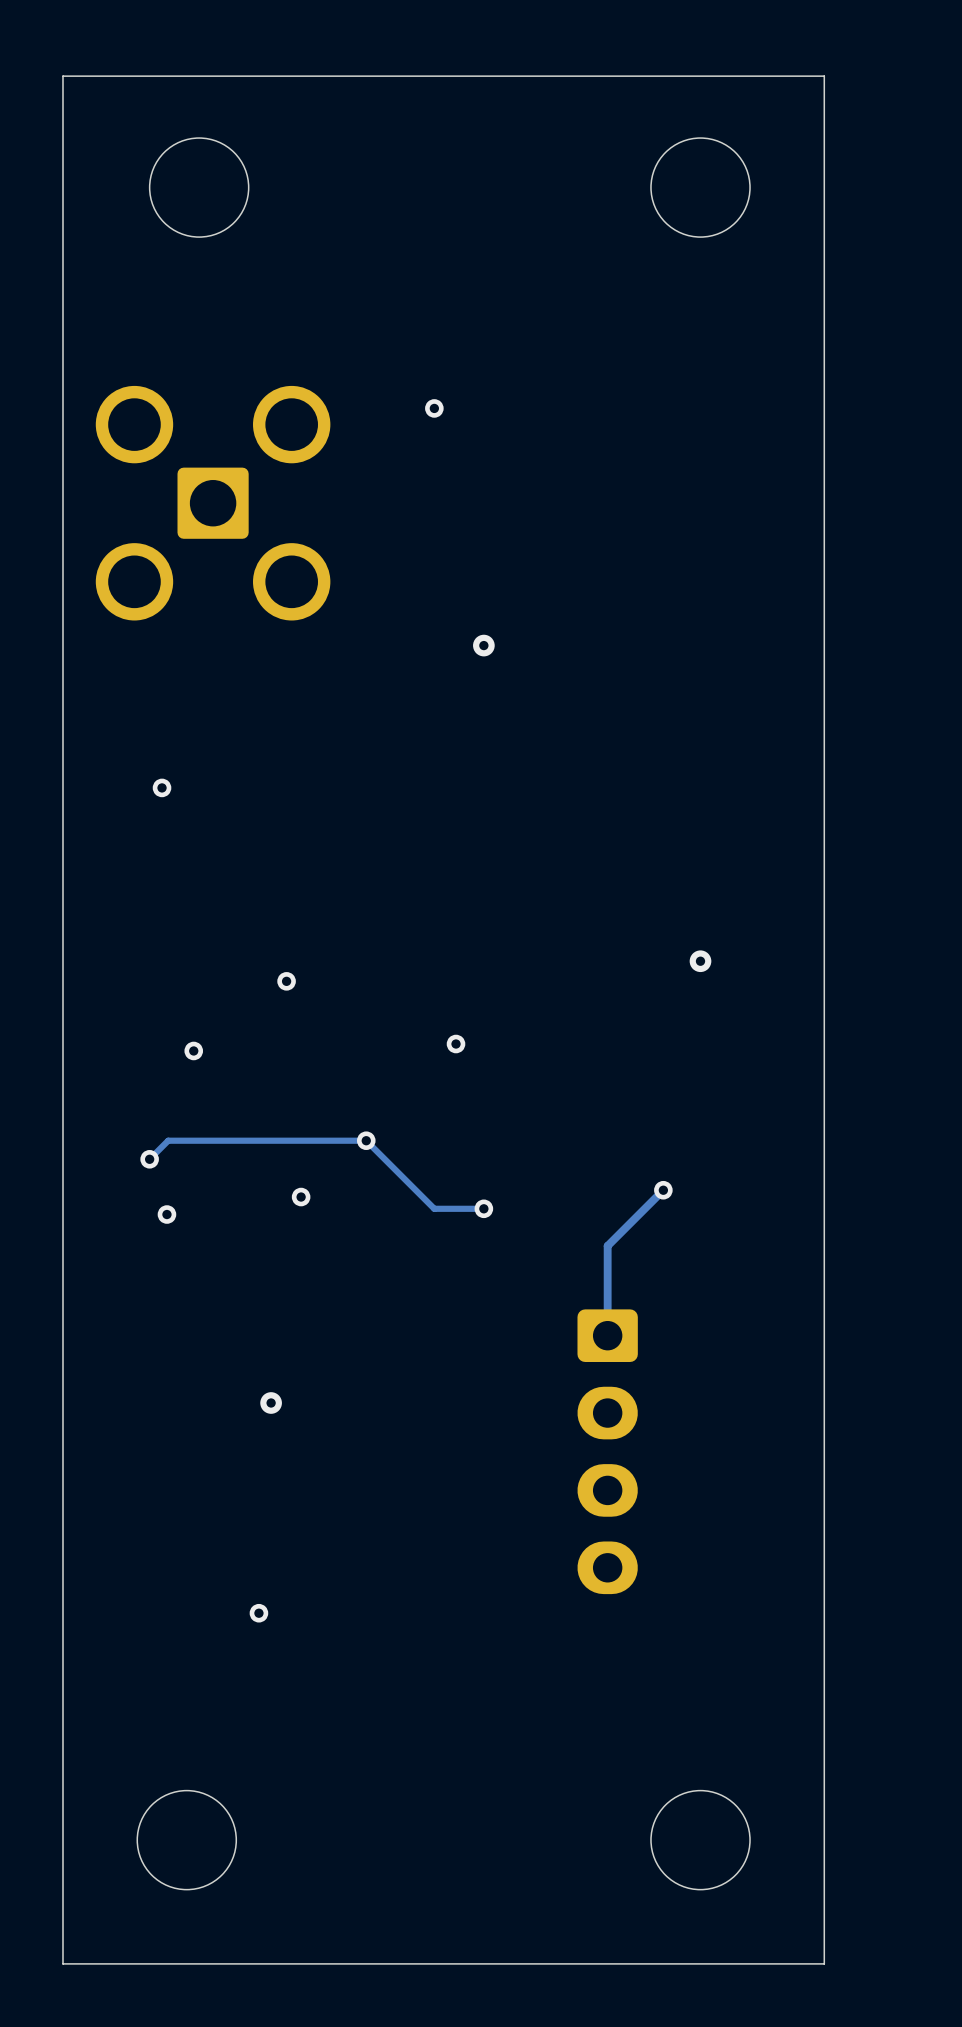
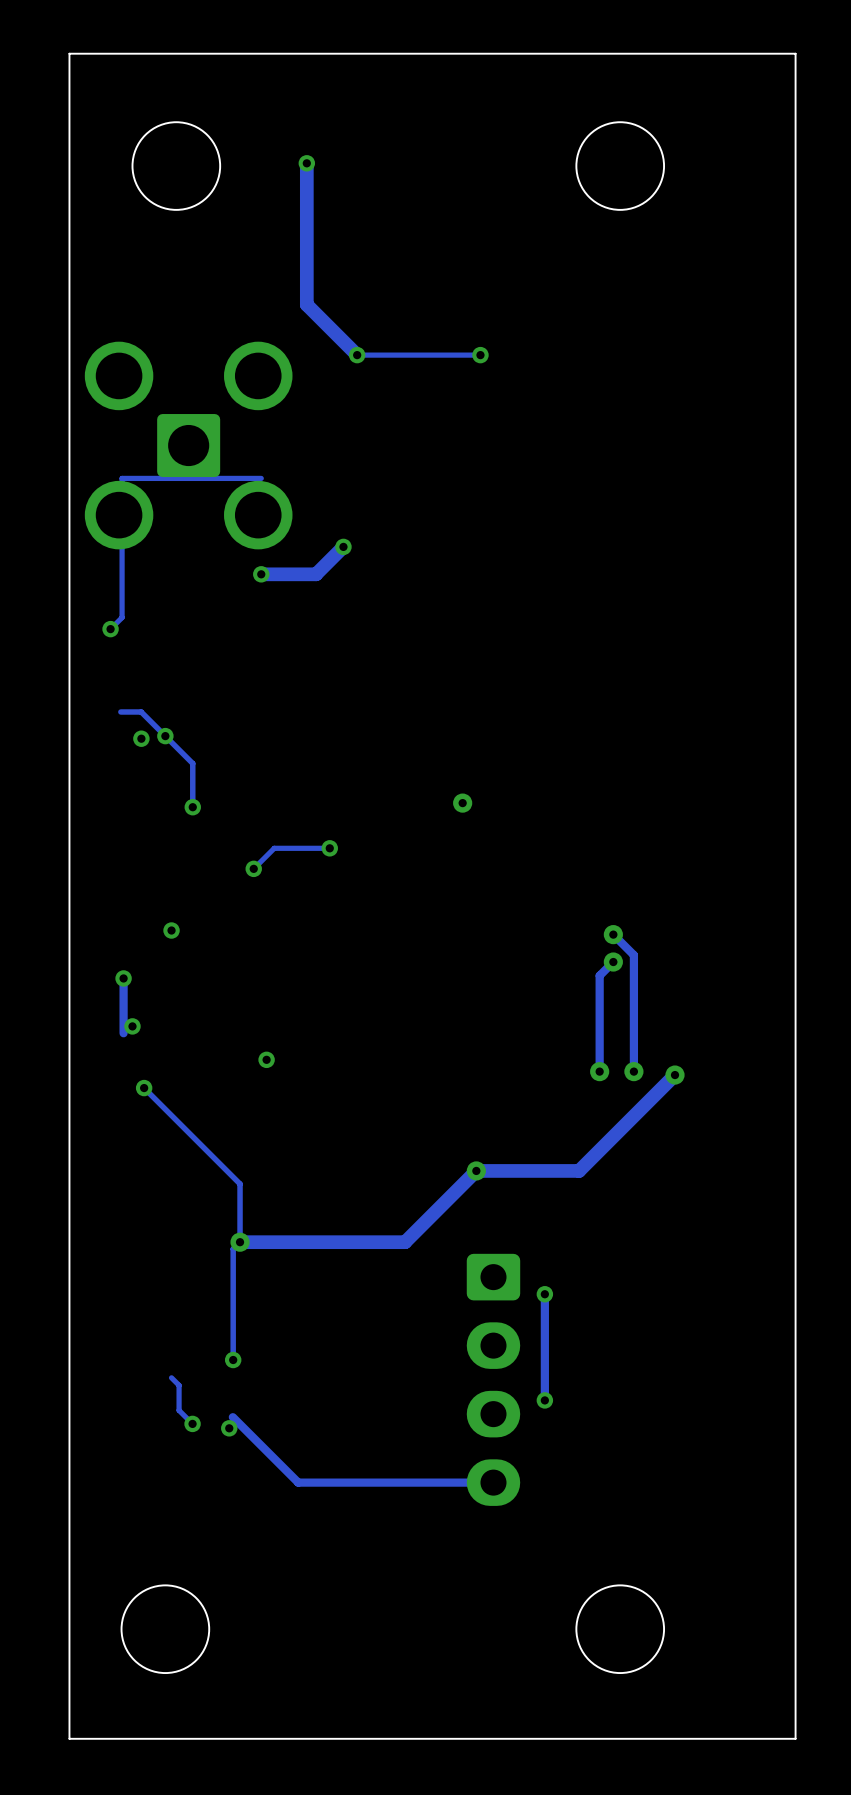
track: none -> (306, 163) (306, 304) (357, 355) (480, 355)
via: none -> (306, 163)
via: none -> (480, 355)
via position: (434, 408) -> (357, 355)
track: none -> (261, 478) (122, 478) (122, 617) (110, 629)
track: none -> (343, 546) (316, 574) (261, 574)
via: none -> (343, 546)
via: (483, 645) -> none
via: none -> (261, 574)
via: none -> (110, 629)
via: (162, 787) -> none
track: none -> (120, 711) (141, 711) (192, 763) (192, 807)
via: none -> (165, 736)
via: none -> (141, 738)
via: none -> (462, 803)
via: none -> (192, 807)
track: none -> (329, 848) (274, 848) (253, 868)
via: none -> (329, 848)
via: (700, 961) -> none
via: (456, 1044) -> none
track: none -> (613, 934) (633, 955) (633, 1071)
via: none -> (613, 934)
track: none -> (613, 962) (599, 975) (599, 1071)
via: none -> (613, 962)
track: none -> (123, 978) (123, 1033)
via: none -> (123, 978)
via: (366, 1140) -> none
track: (149, 1159) (168, 1140) (366, 1140) (434, 1208) (483, 1208) -> none
track: (663, 1190) (607, 1245) (607, 1335) -> none
via: (663, 1190) -> none
via: (483, 1208) -> none
via: none -> (599, 1071)
via: none -> (633, 1071)
via position: (166, 1214) -> (144, 1088)
track: none -> (675, 1075) (579, 1170) (476, 1170) (405, 1242) (240, 1242)
via: none -> (675, 1075)
track: none -> (144, 1088) (240, 1183) (240, 1242)
via: none -> (476, 1170)
track: none -> (240, 1242) (233, 1249) (233, 1360)
part position: (607, 1451) -> (493, 1379)
track: none -> (544, 1294) (544, 1400)
via: none -> (544, 1294)
via: none -> (233, 1360)
track: none -> (171, 1377) (179, 1385) (179, 1410) (192, 1423)
via: none -> (544, 1400)
track: none -> (232, 1417) (298, 1482) (493, 1482)
via: none -> (192, 1423)
board edge: (824, 1963) (824, 76) (62, 76) (62, 1963) (78, 1963) -> (729, 1738) (795, 1738) (795, 53) (69, 53) (69, 1738)

